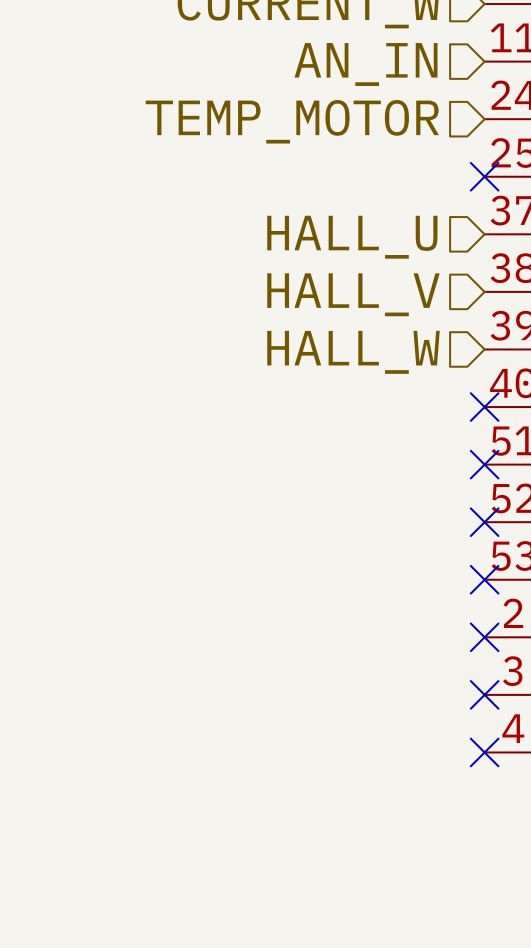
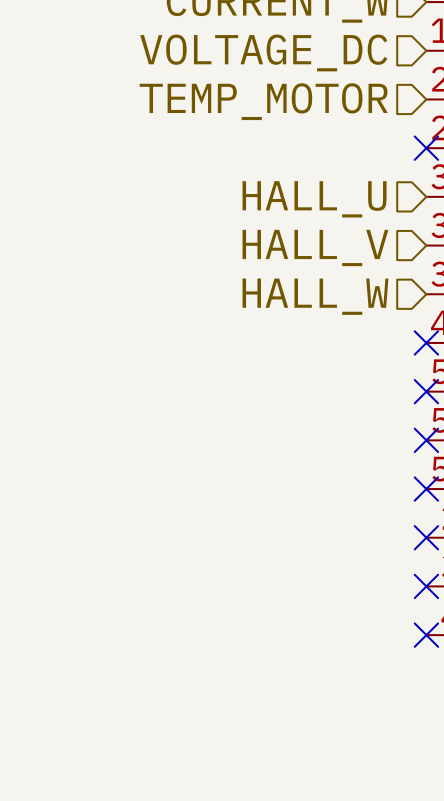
hierarchical label: AN_IN (366, 64) -> VOLTAGE_DC (263, 52)

